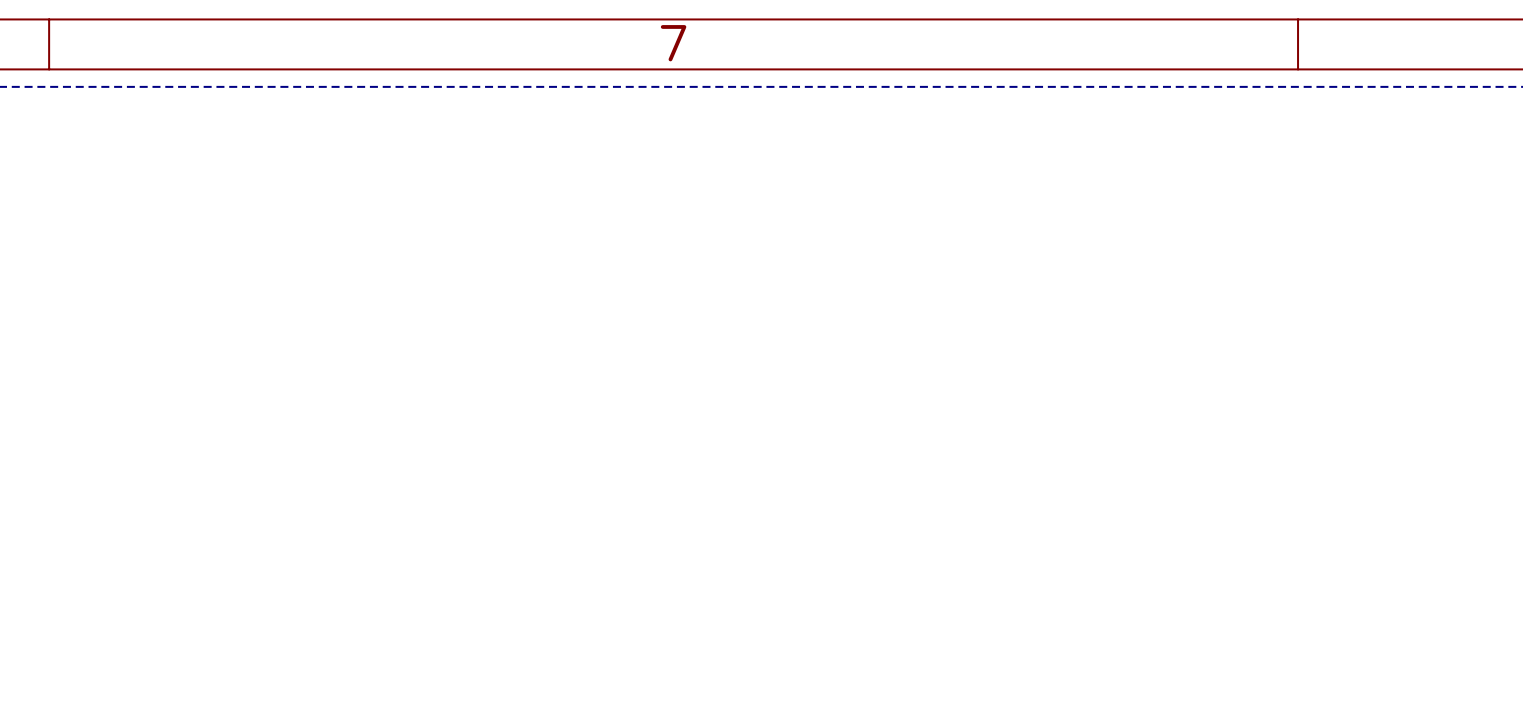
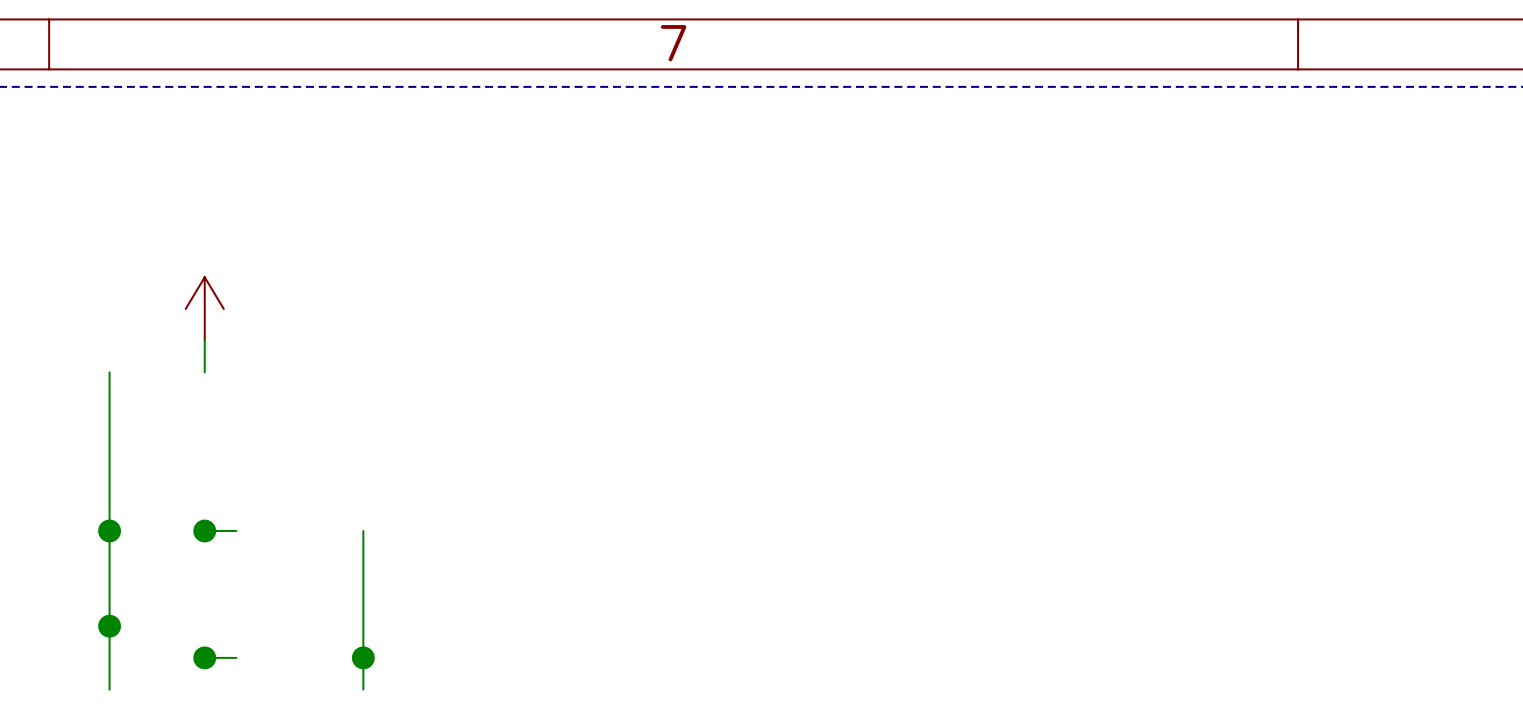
power symbol: none -> (204, 308)
wire: none -> (204, 340) (204, 372)
wire: none -> (109, 372) (109, 689)
junction: none -> (109, 531)
wire: none -> (204, 531) (236, 531)
junction: none -> (204, 531)
wire: none -> (363, 531) (363, 689)
junction: none -> (109, 626)
wire: none -> (204, 657) (236, 657)
junction: none -> (204, 657)
junction: none -> (363, 657)

